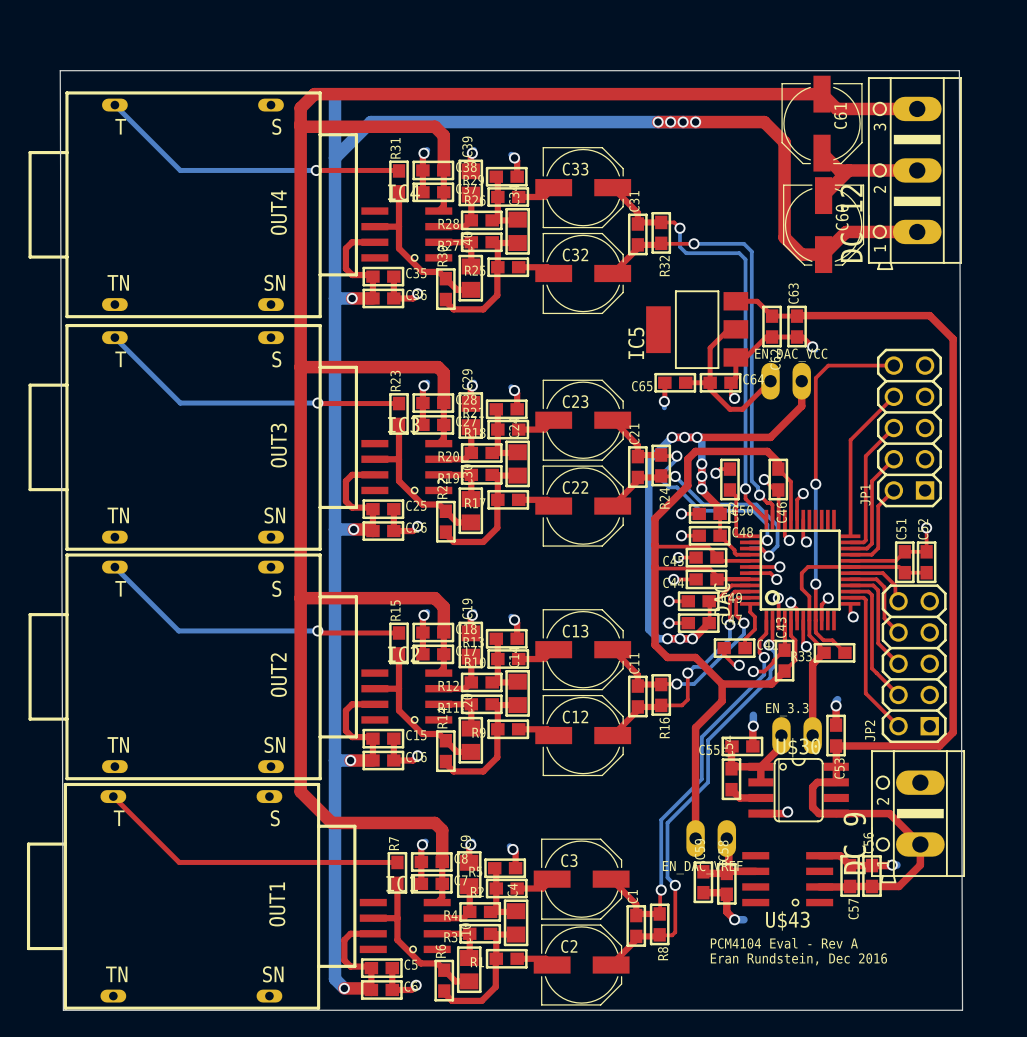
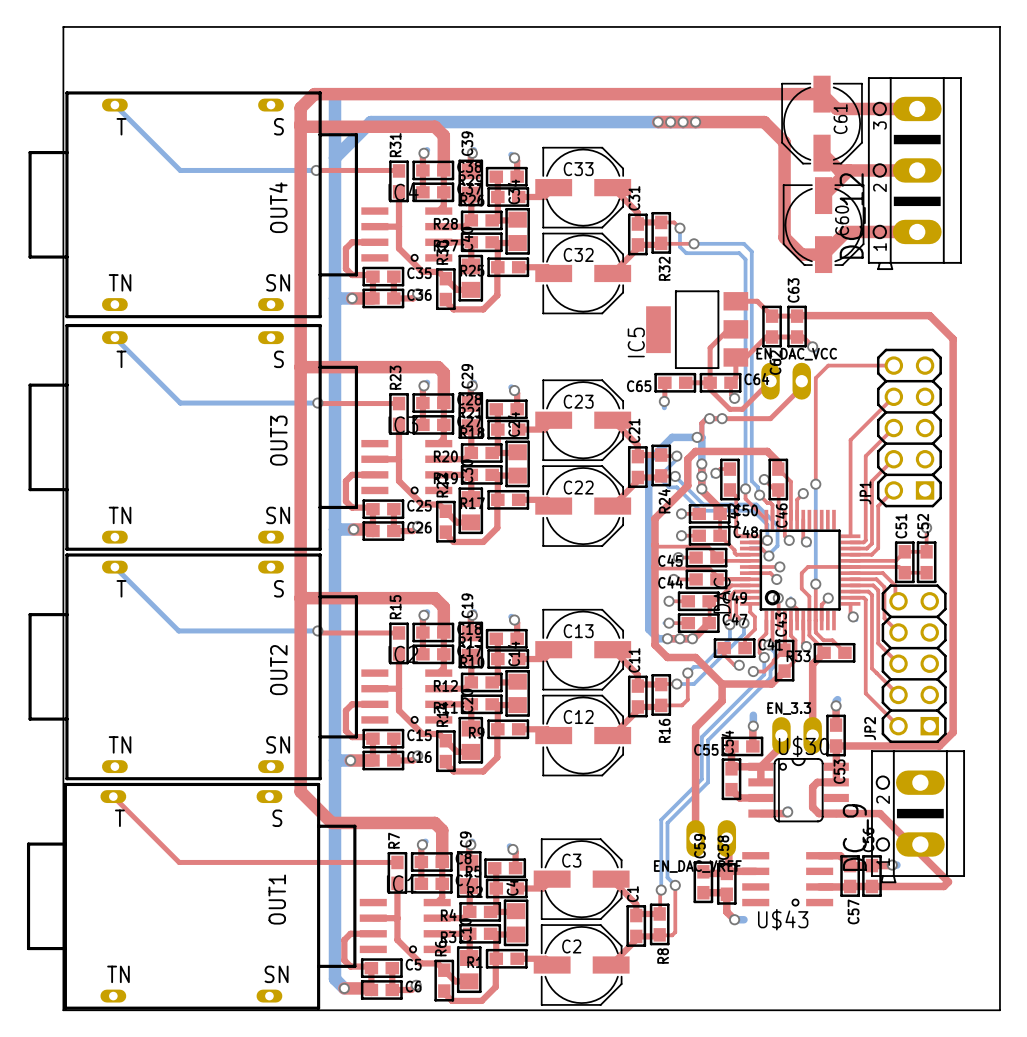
top track: (801, 387) (801, 406) (770, 437) (672, 437) -> (801, 387) (770, 418) (706, 418) (701, 423) (701, 438)
via: none -> (709, 418)
via: none -> (722, 418)
via: (672, 437) -> none
via: (684, 437) -> none
top track: (880, 813) (889, 813) (920, 844) (920, 865) (899, 886) -> (880, 813) (948, 881) (943, 886) (899, 886)
text: PCM4104 Eval - Rev A (784, 943) -> none
text: Eran Rundstein, Dec 2016 (798, 959) -> none
board edge: (63, 1010) (60, 70) (959, 70) (962, 1010) -> (63, 1010) (63, 26) (999, 26) (999, 1010) (962, 1010)

